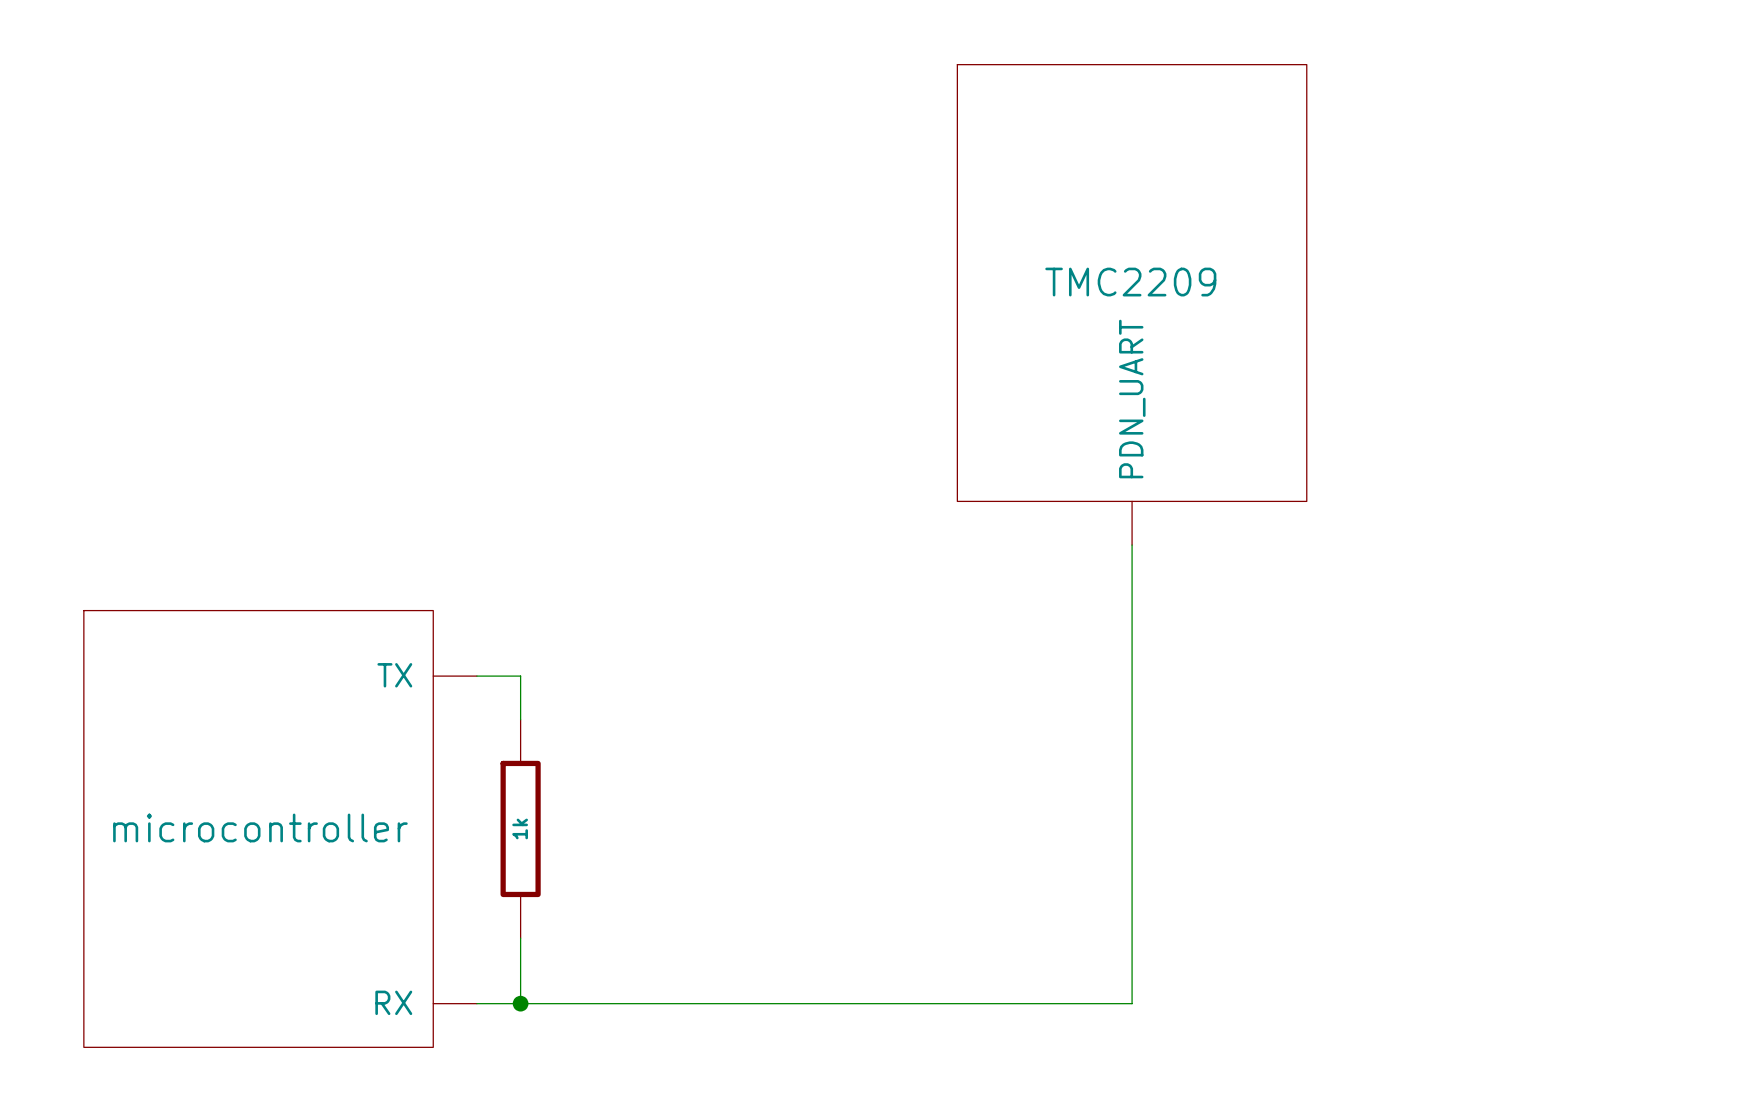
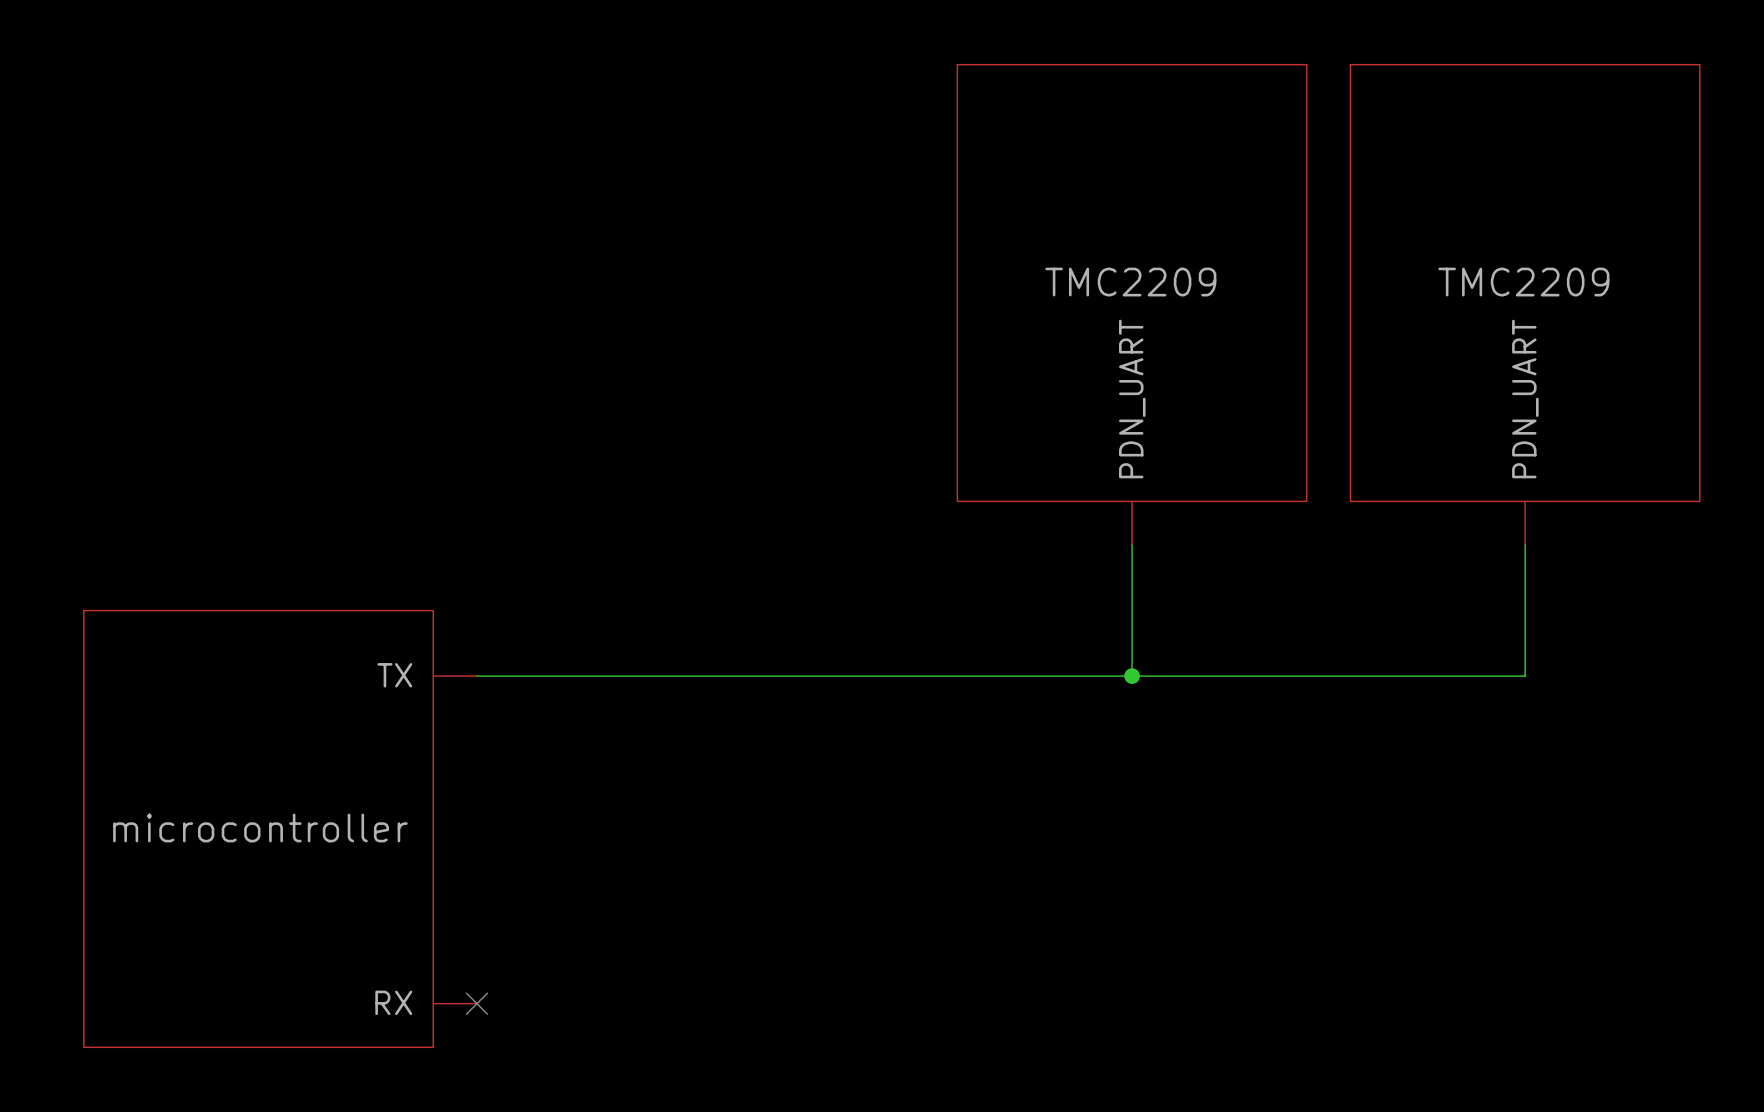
part: none -> TMC2209 (1525, 304)
wire: (520, 676) (520, 719) -> (520, 676) (1525, 676) (1525, 545)
wire: (1132, 676) (1132, 1003) (476, 1003) -> none
junction: none -> (1132, 676)
part: 1k (520, 828) -> none
wire: (520, 938) (520, 1003) -> none
no-connect mark: none -> (476, 1003)
junction: (520, 1003) -> none

